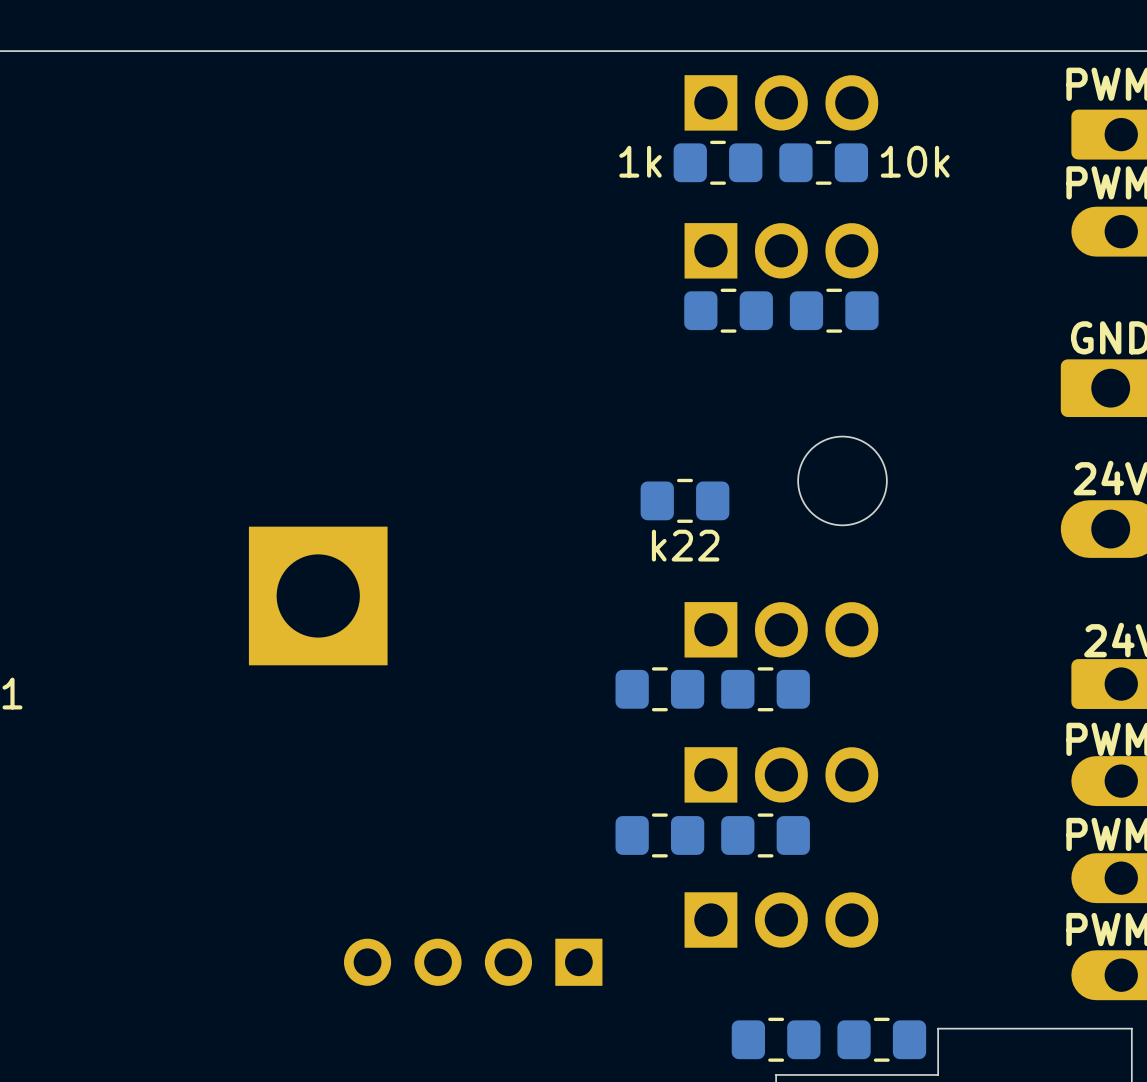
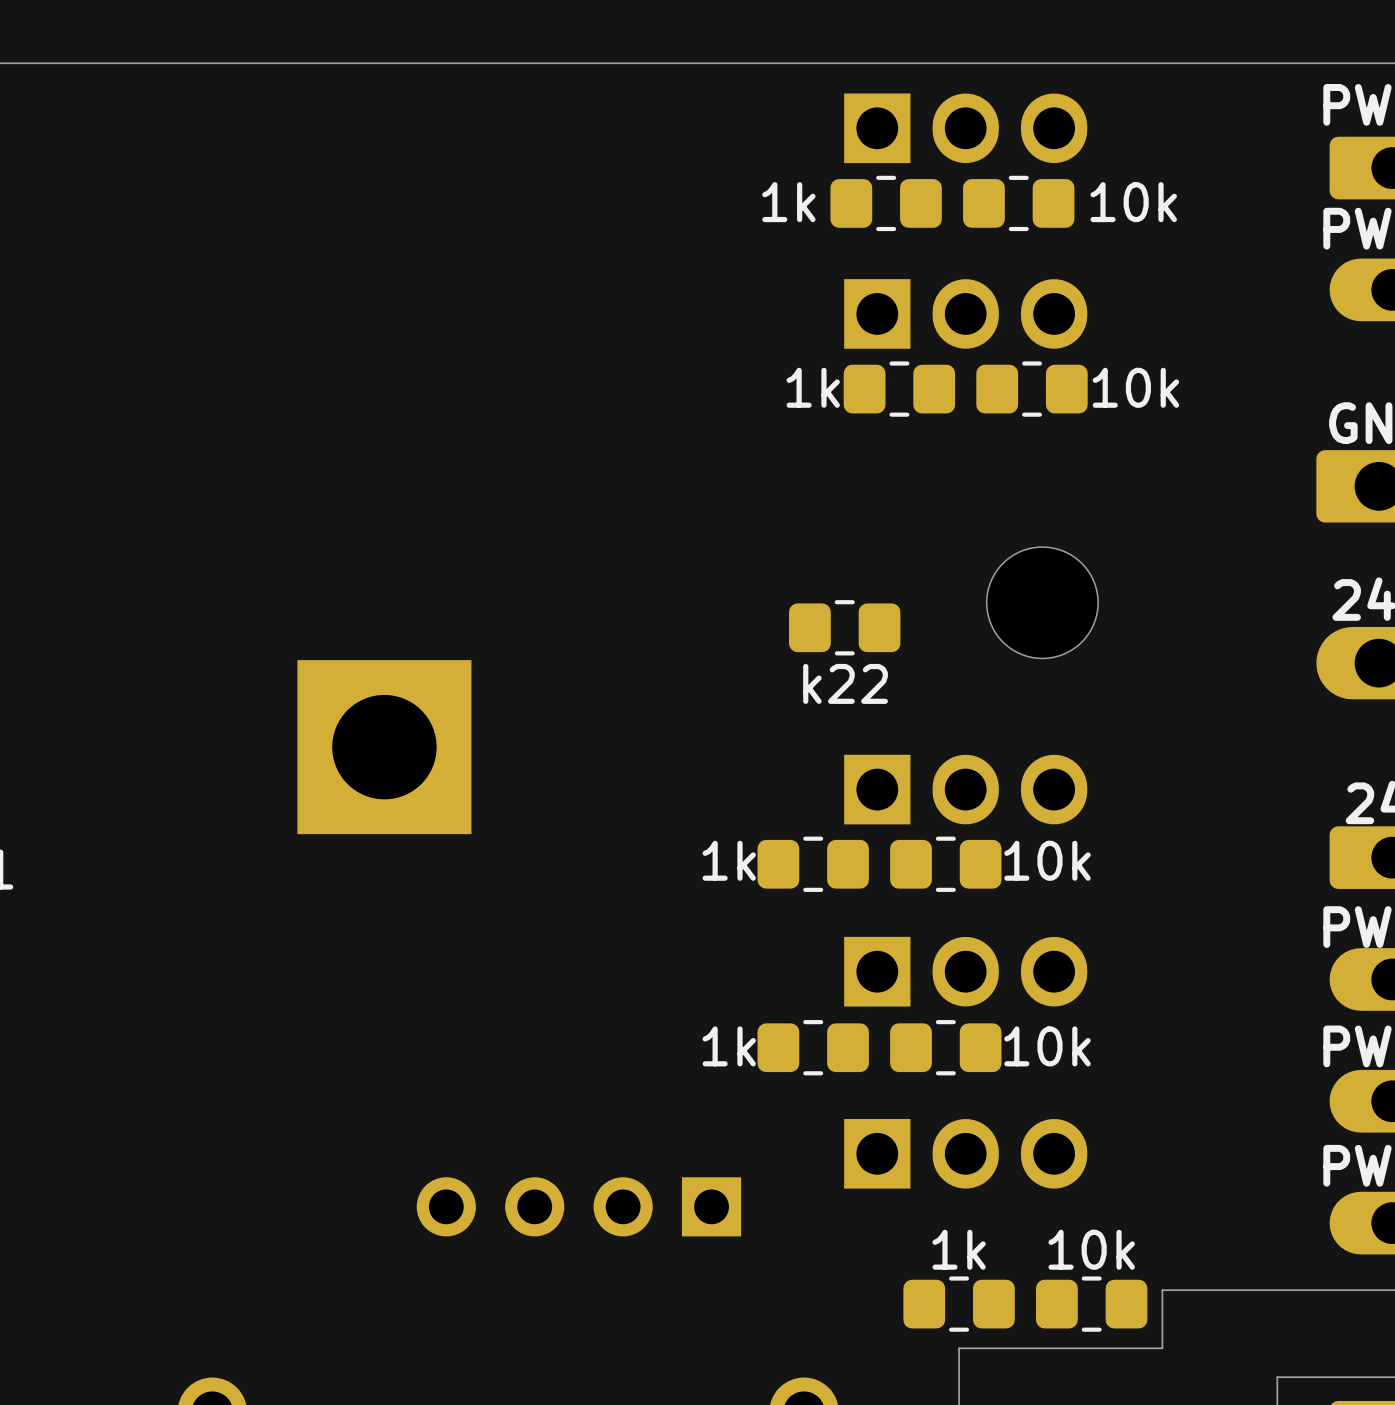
part value: none -> 1k (813, 387)
part value: none -> 10k (1135, 387)
part value: none -> 1k (729, 860)
part value: none -> 10k (1047, 860)
part value: none -> 1k (729, 1046)
part value: none -> 10k (1047, 1046)
part value: none -> 1k (959, 1249)
part value: none -> 10k (1091, 1249)

